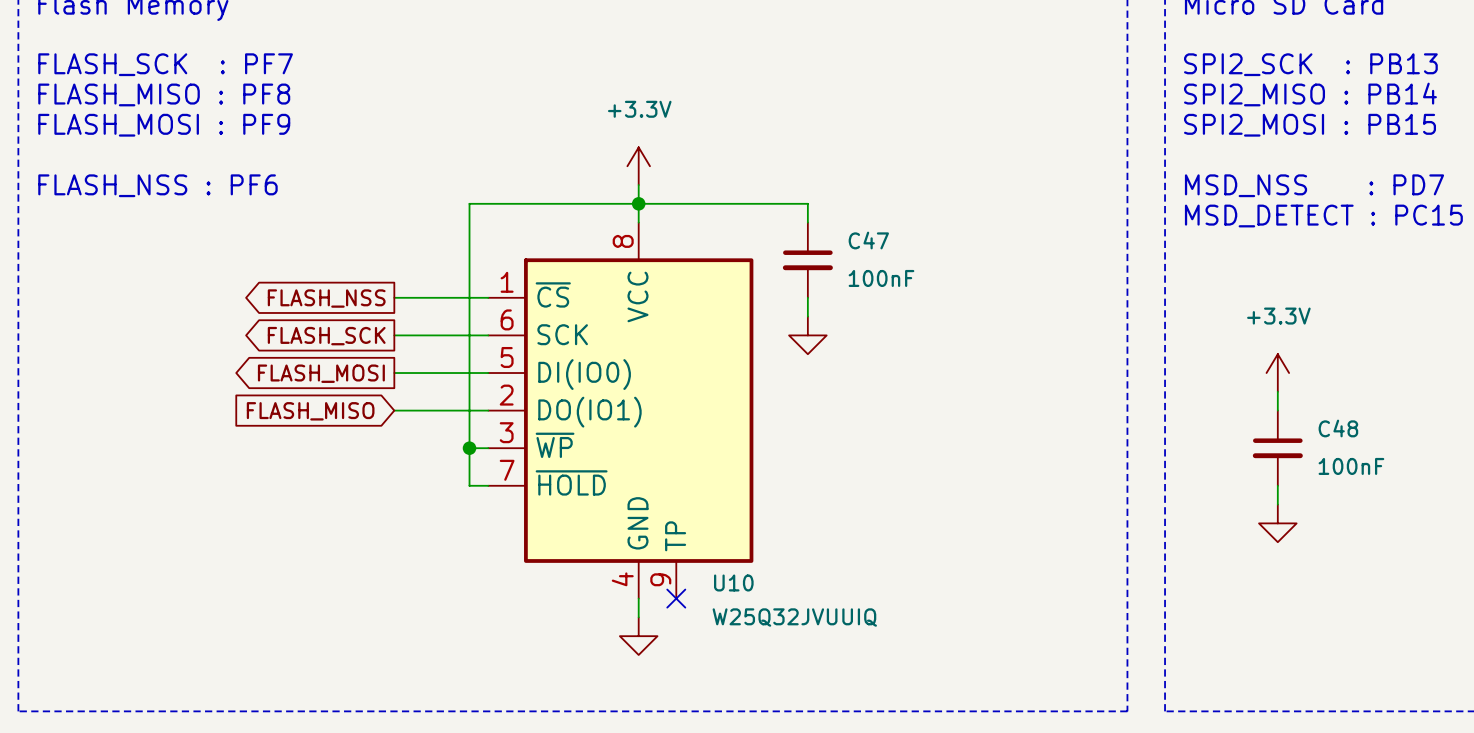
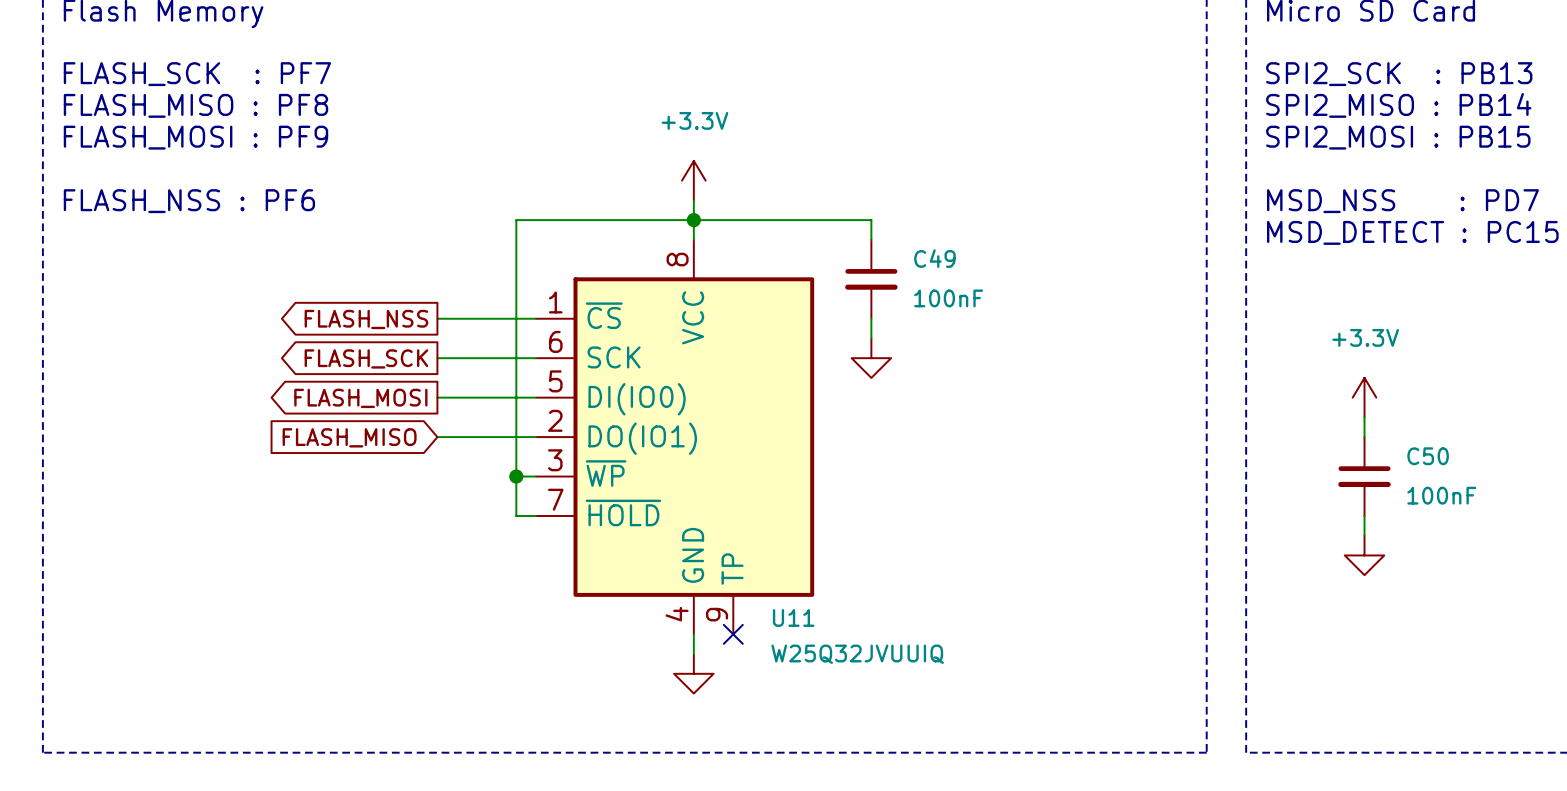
C47 name: C47 (868, 240) -> C49 (934, 258)
C48 name: C48 (1338, 428) -> C50 (1428, 456)
U10 name: U10 (733, 582) -> U11 (793, 617)

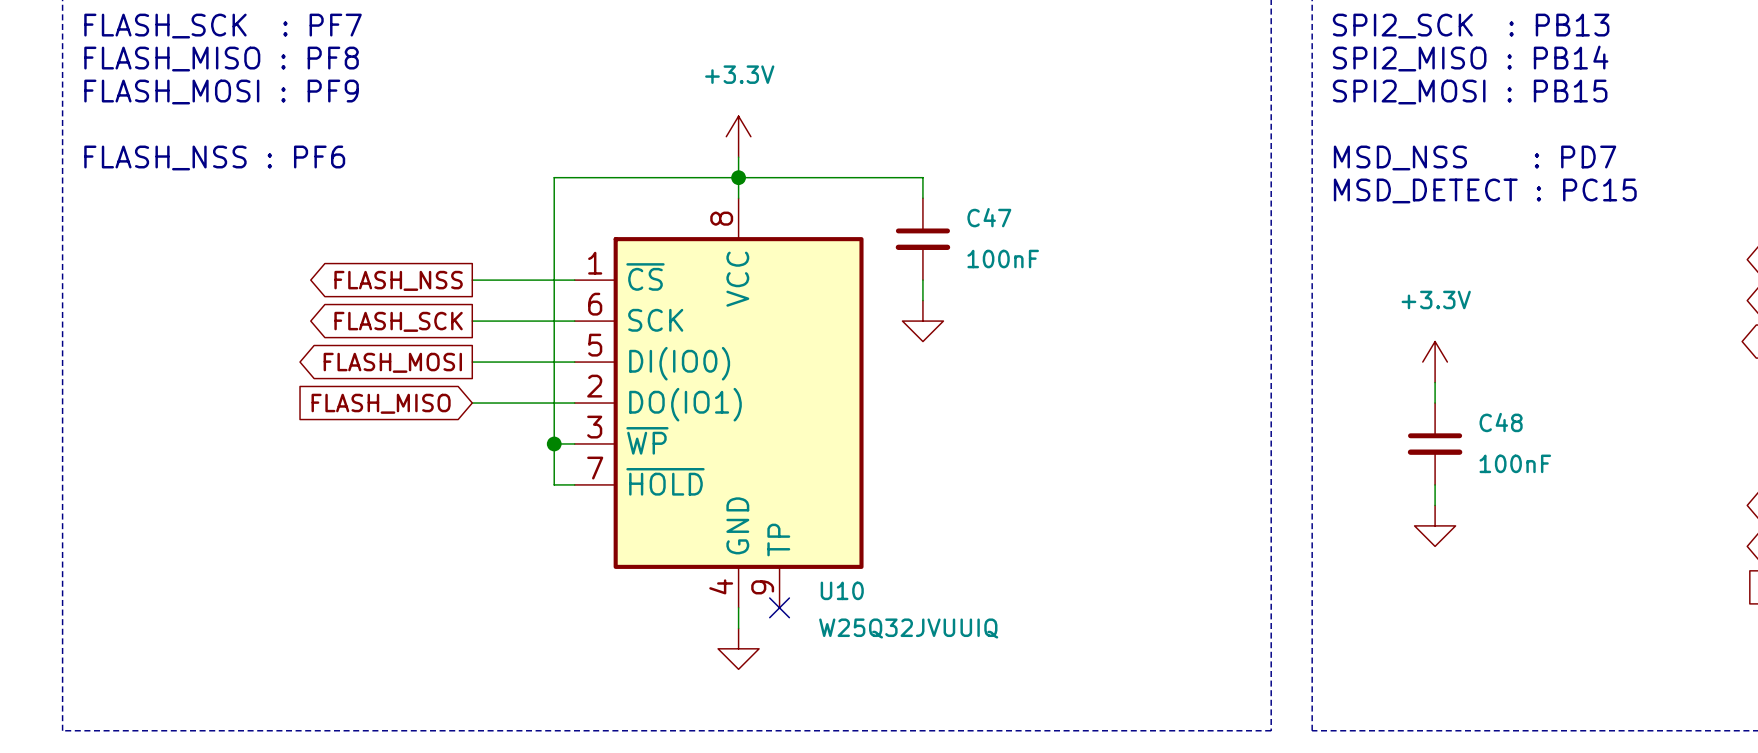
C49 name: C49 (934, 258) -> C47 (989, 217)
C50 name: C50 (1428, 456) -> C48 (1501, 422)
U11 name: U11 (793, 617) -> U10 (842, 590)

